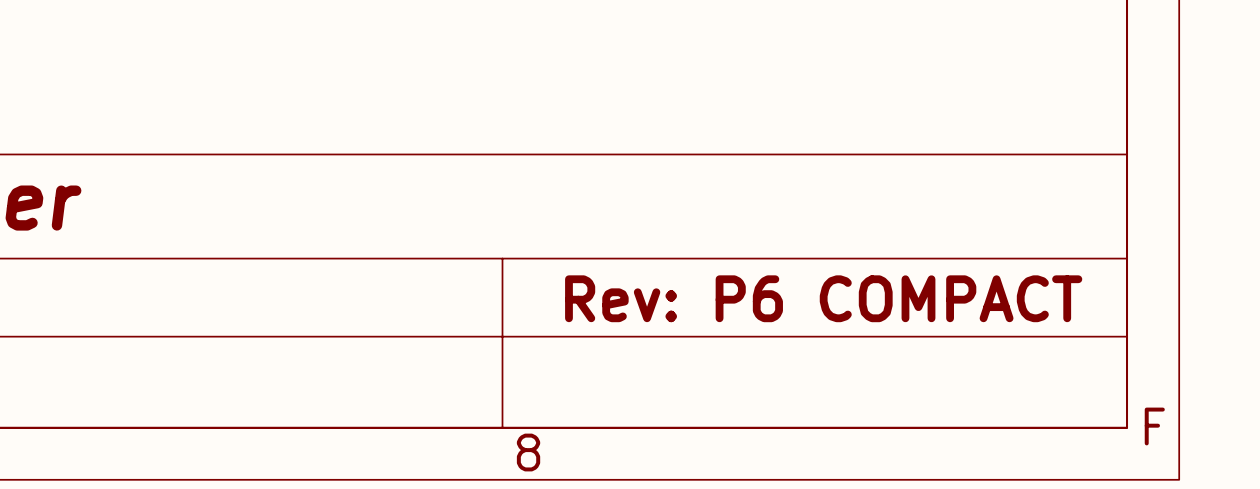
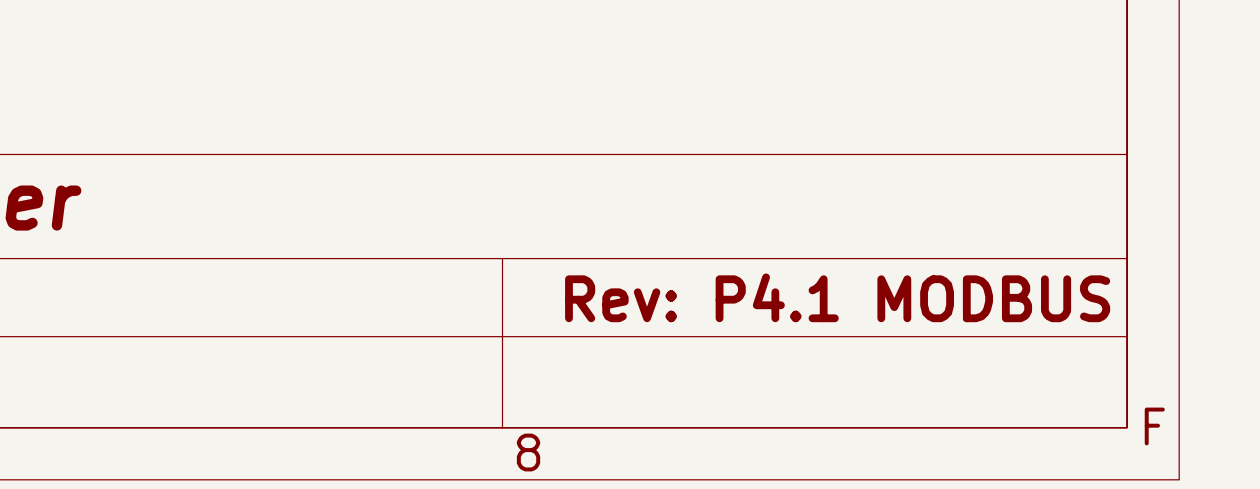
title block: Rev: P6 COMPACT (823, 298) -> Rev: P4.1 MODBUS (837, 297)

